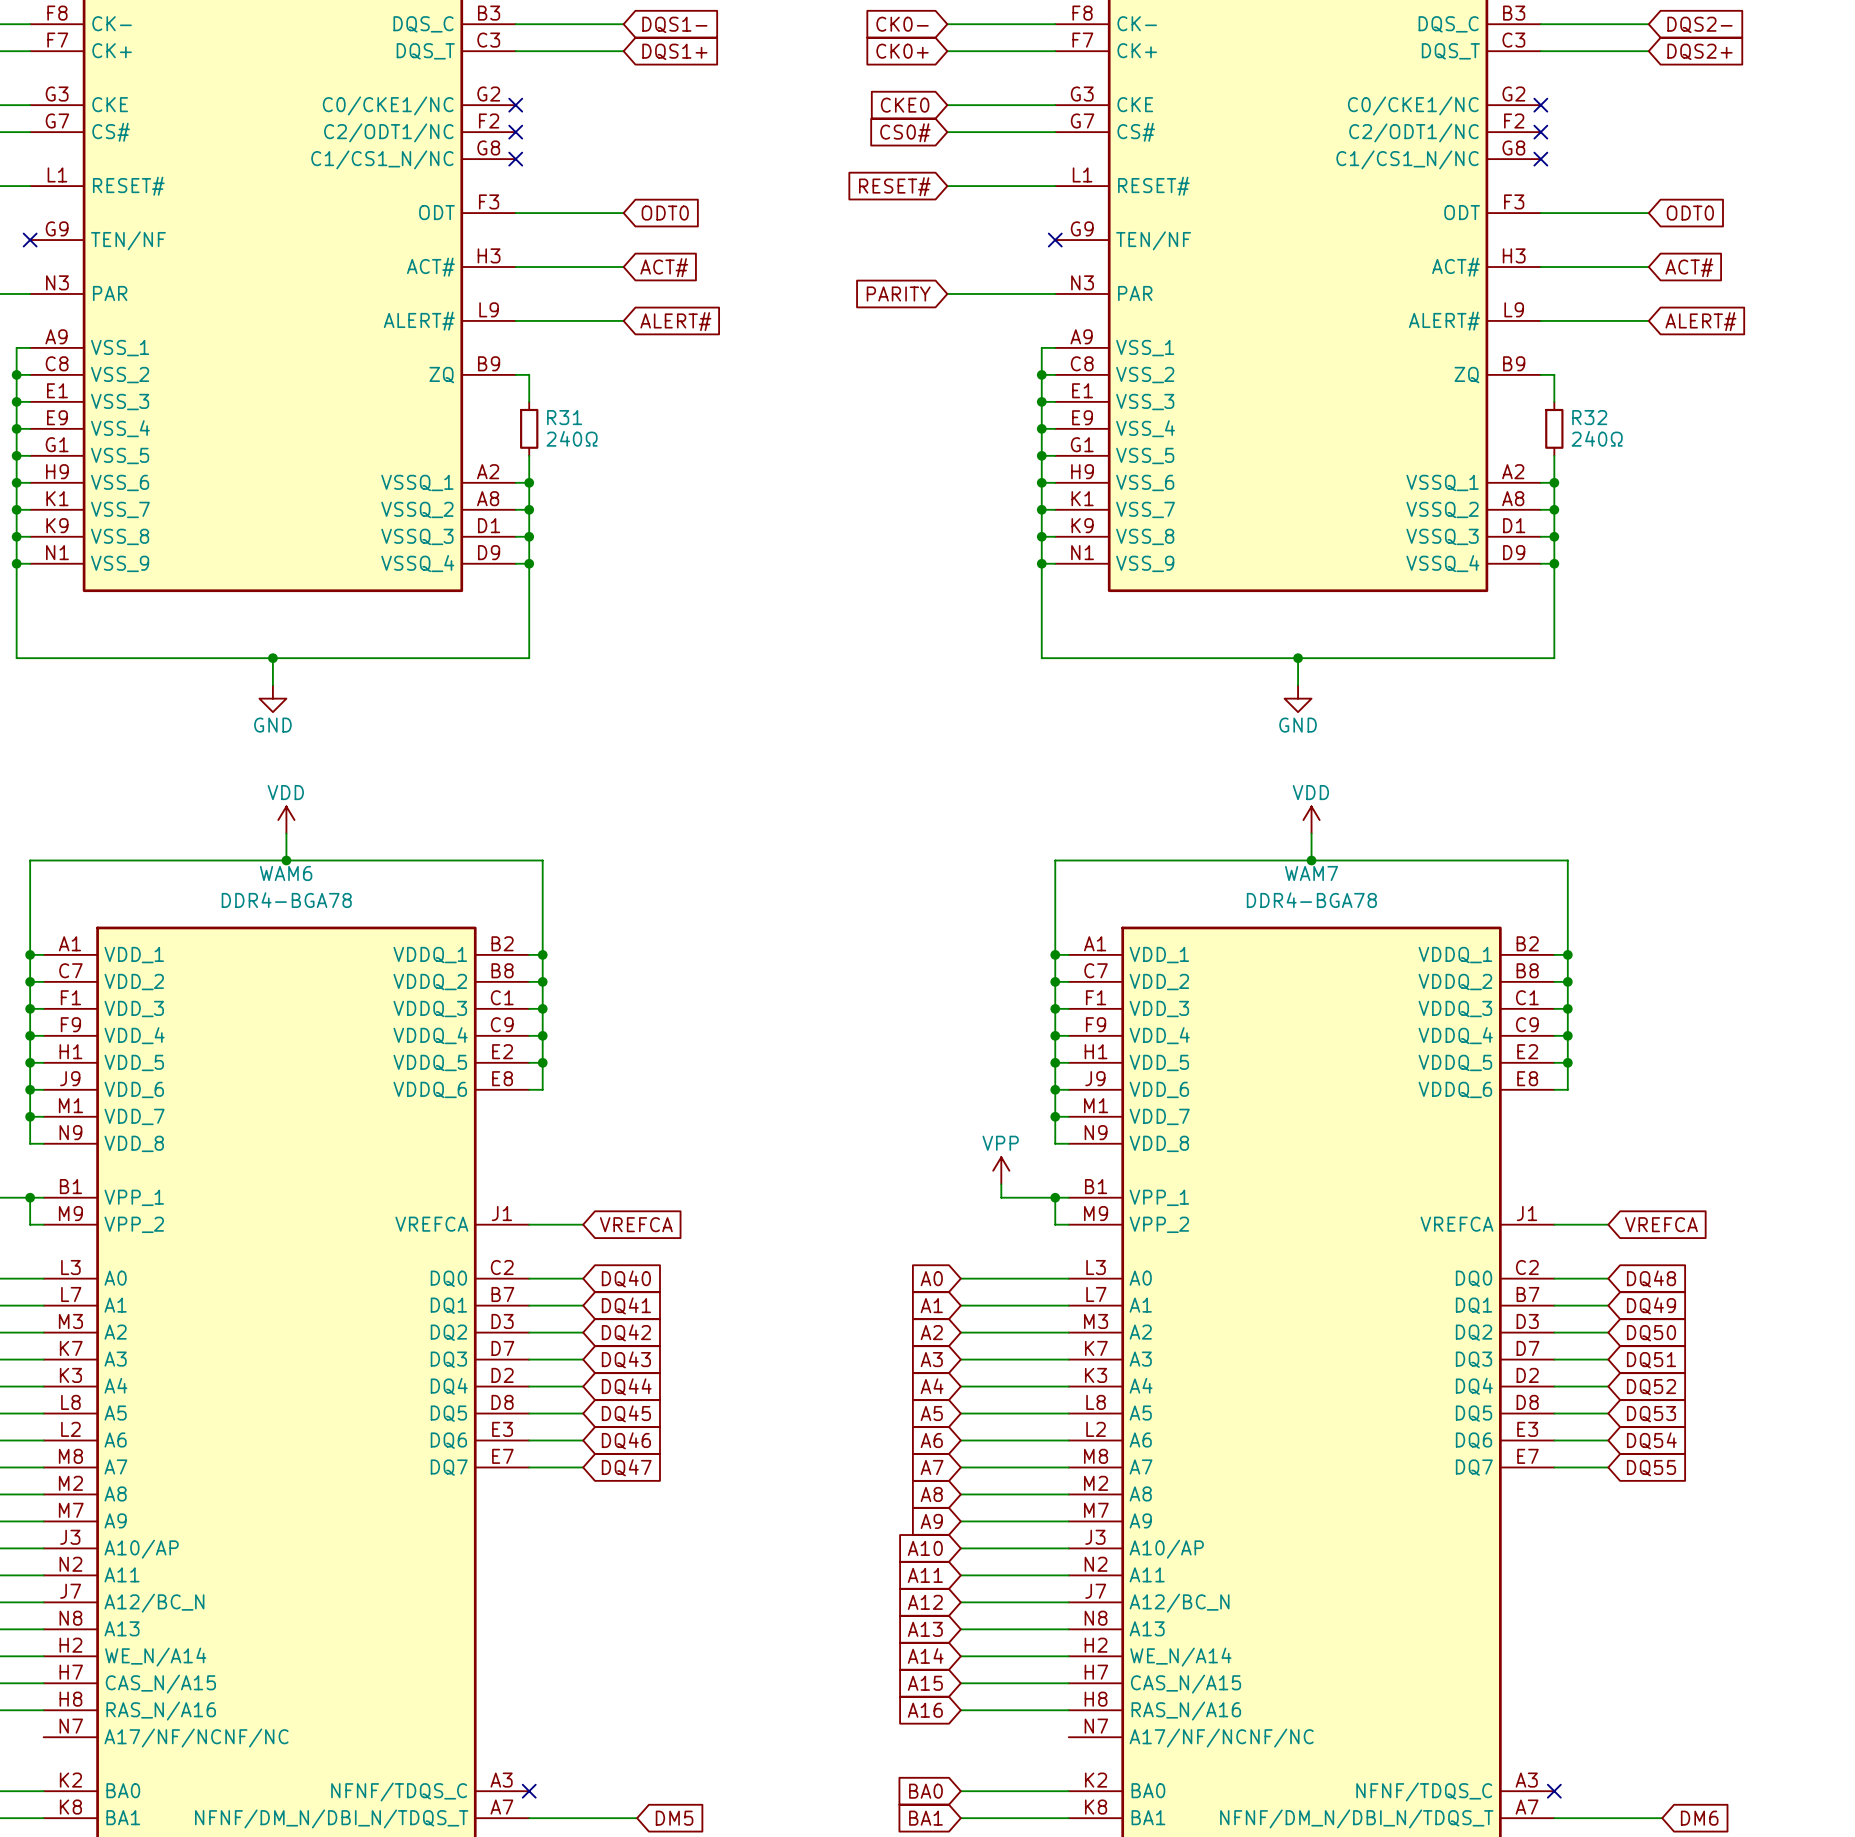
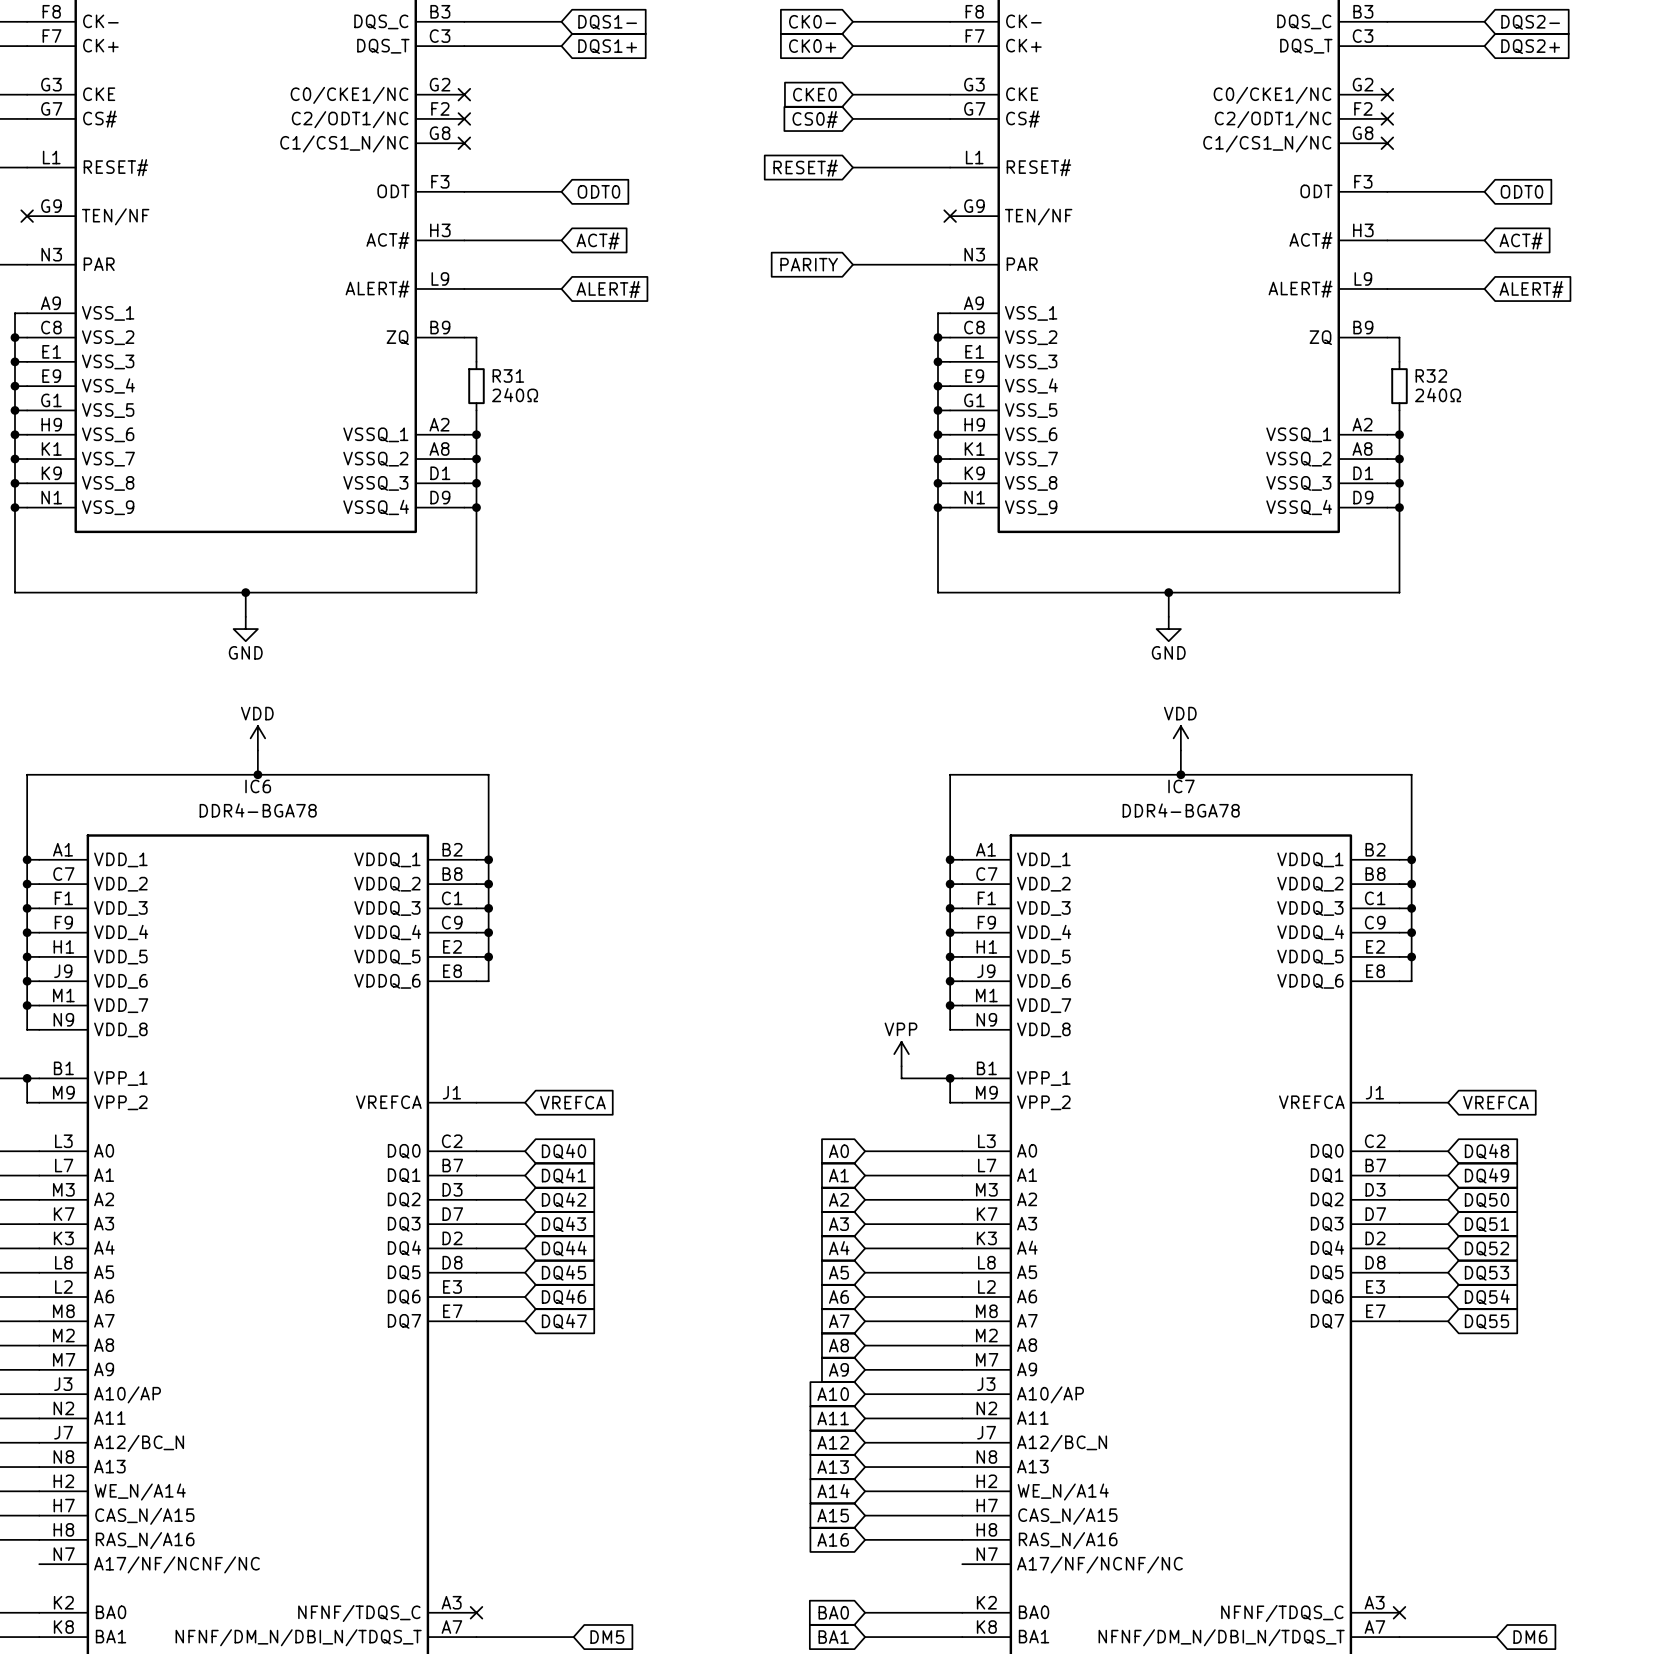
WAM6 name: WAM6 (286, 873) -> IC6 (258, 786)
WAM7 name: WAM7 (1311, 873) -> IC7 (1181, 786)

